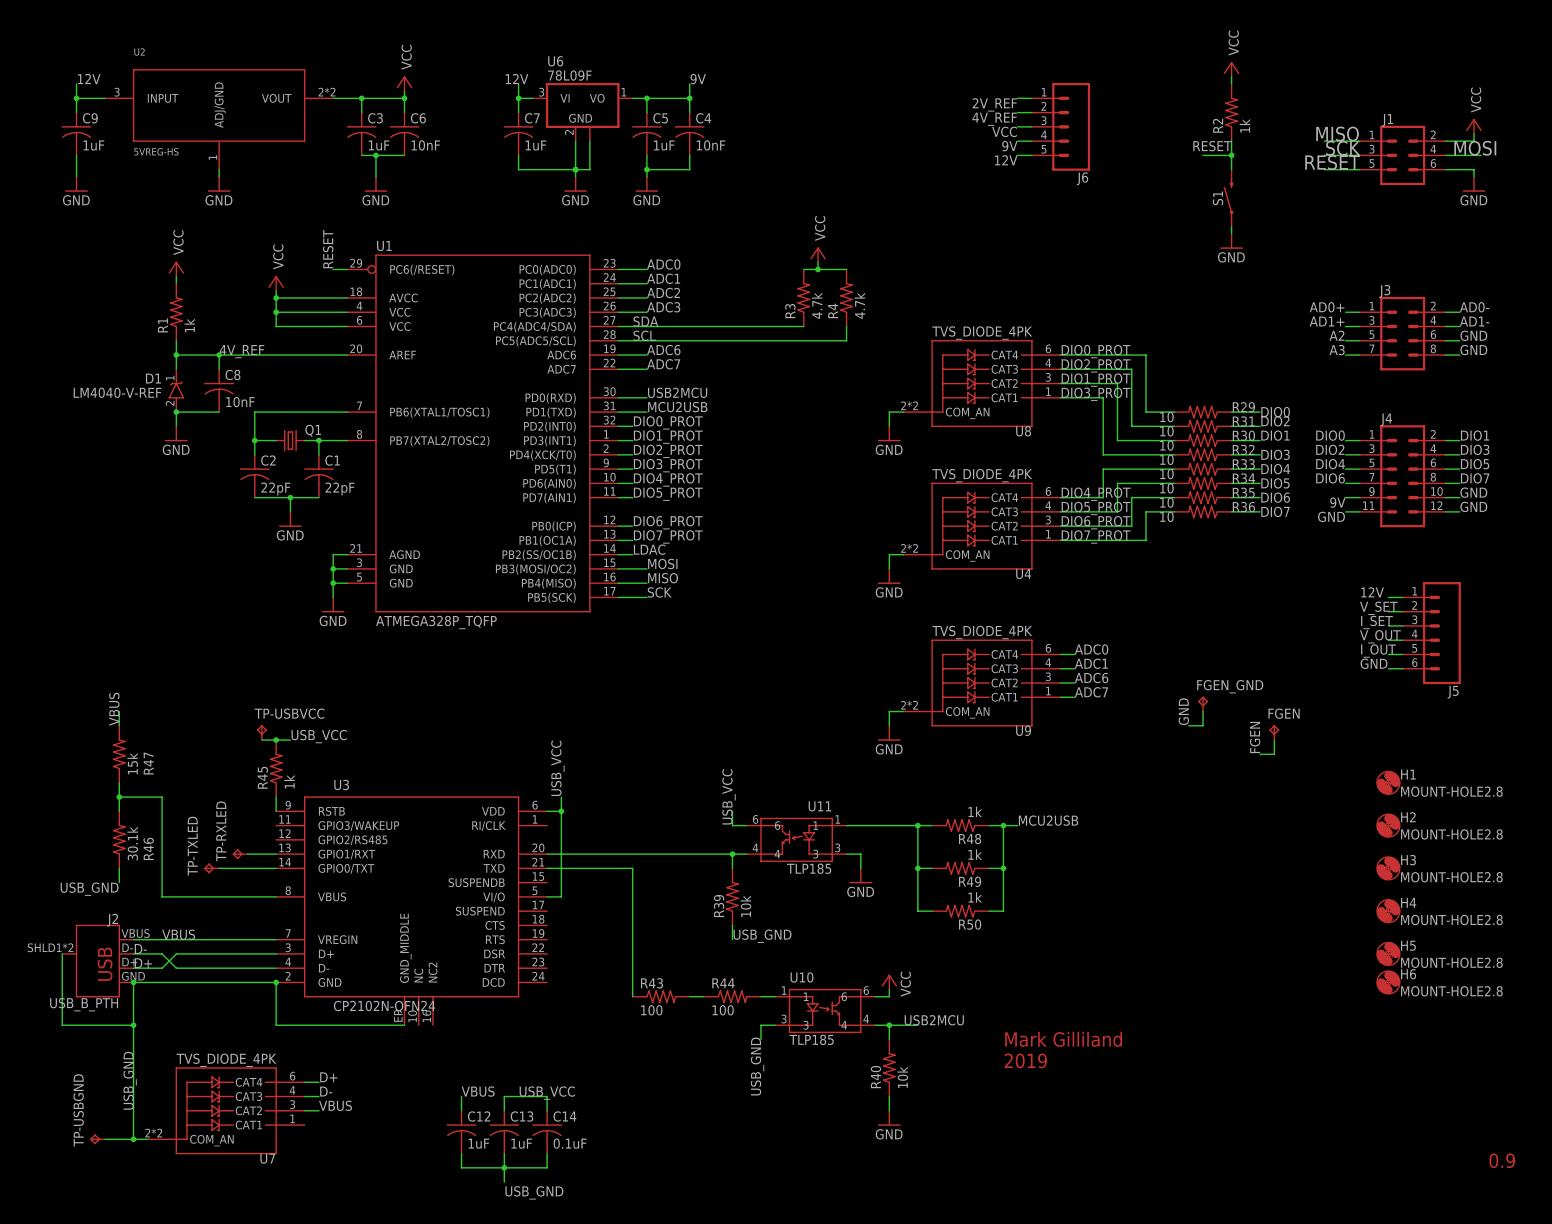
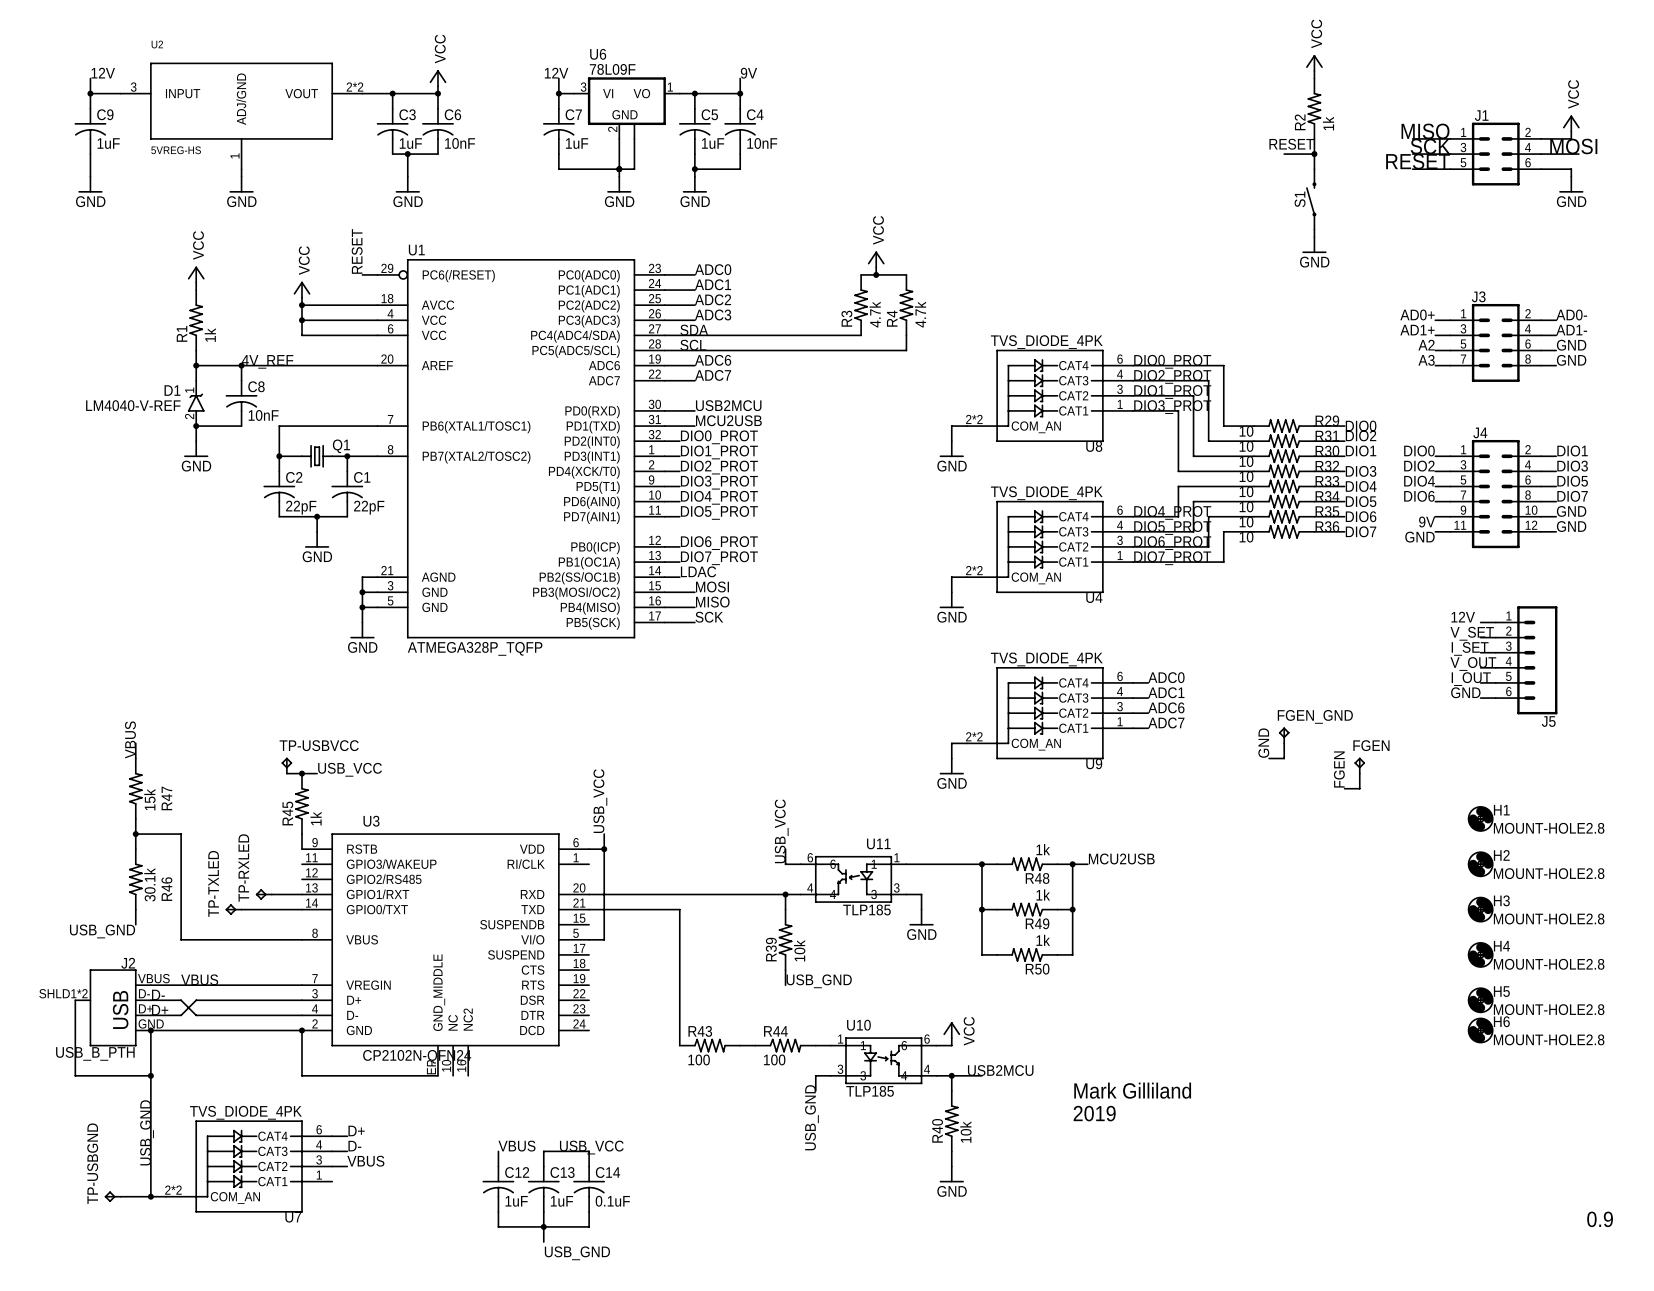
wire: (1017, 98) (1031, 98) -> none
label: 2V_REF (994, 104) -> none
wire: (1017, 112) (1031, 112) -> none
label: 4V_REF (994, 119) -> none
wire: (1017, 126) (1031, 126) -> none
J6: (1061, 126) -> none
label: VCC (1004, 131) -> none
wire: (1017, 141) (1031, 141) -> none
label: 9V (1009, 146) -> none
wire: (1017, 155) (1031, 155) -> none
label: 12V (1006, 160) -> none

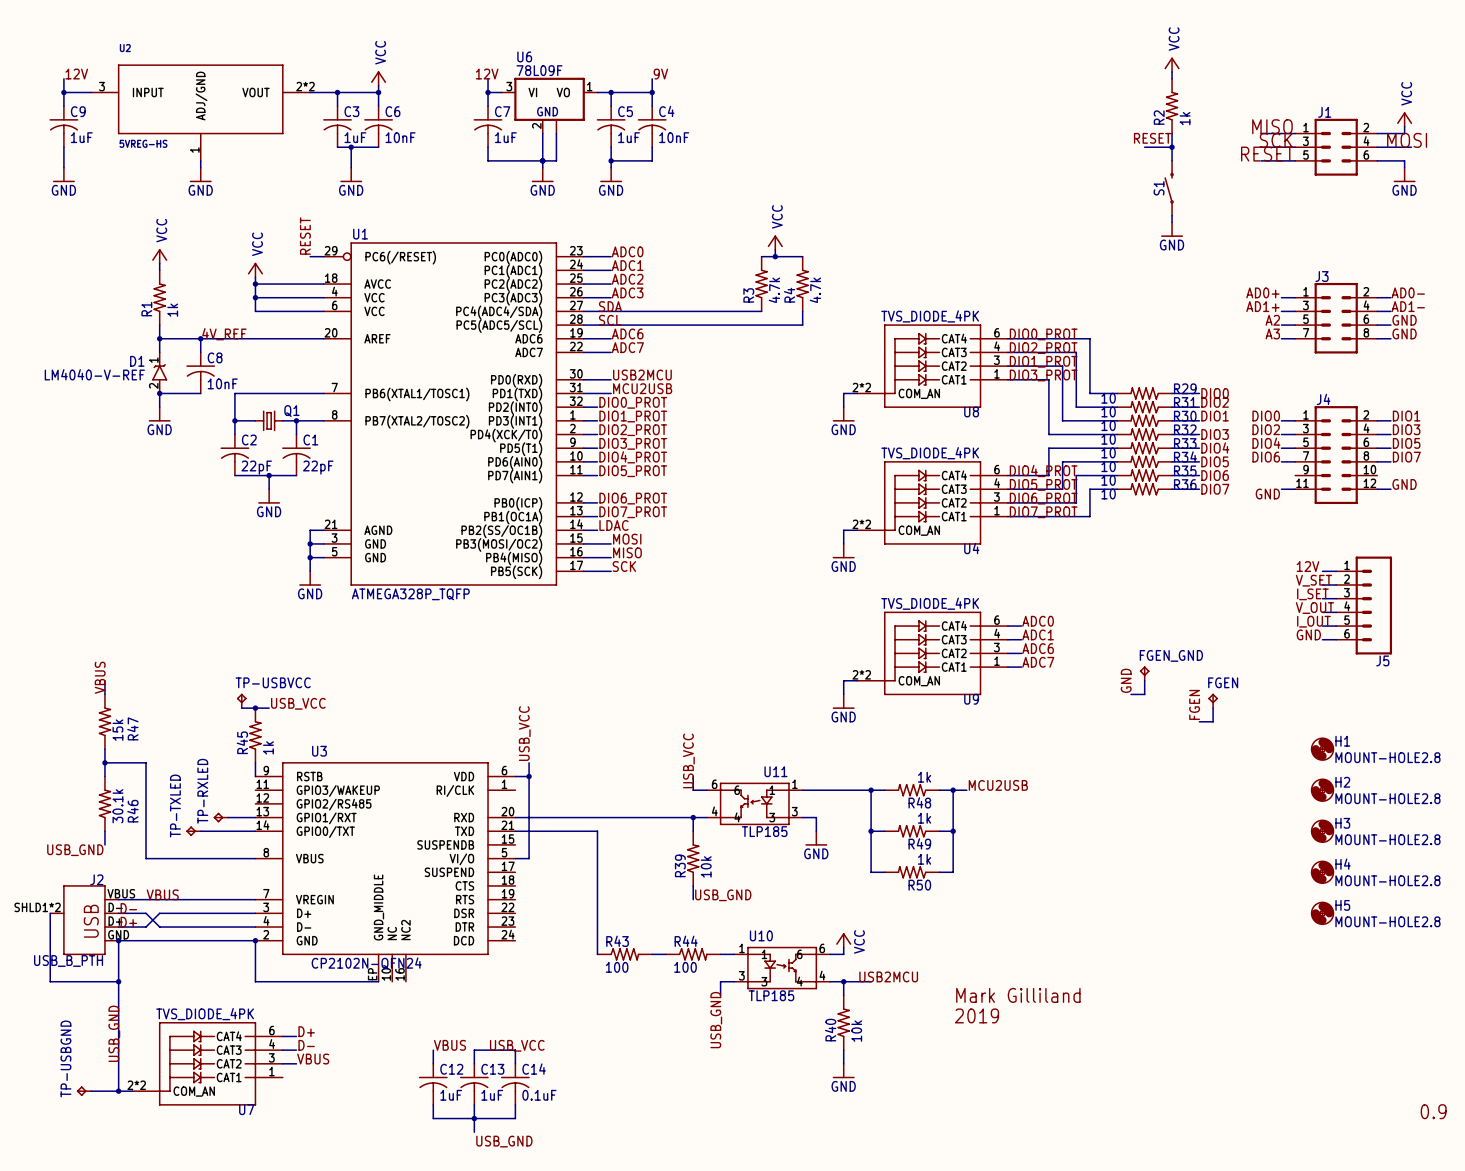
label: GND (1571, 511) -> none
wire: (1435, 516) (1450, 516) -> none
wire: (1541, 516) (1556, 516) -> none
label: 9V (1427, 522) -> none
H6: MOUNT-HOLE2.8 (1480, 1030) -> none

